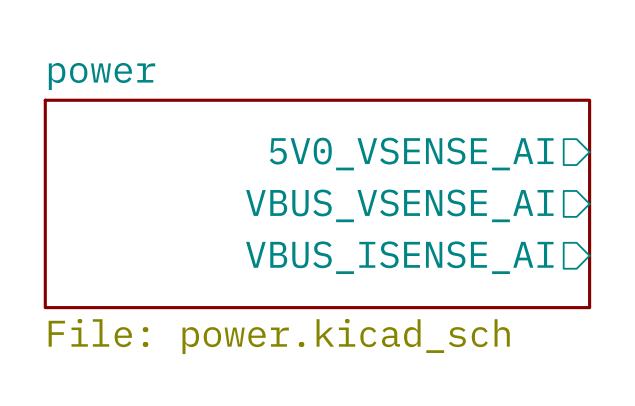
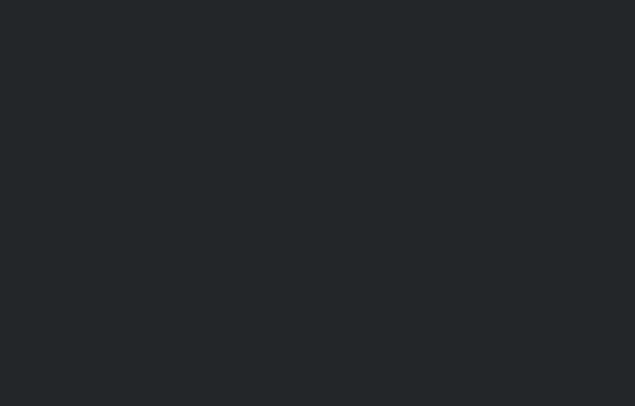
sheet pin: 5V0_VSENSE_AI (411, 154) -> none
sheet power: File: power.kicad_sch (317, 203) -> none
sheet pin: VBUS_VSENSE_AI (399, 205) -> none
sheet pin: VBUS_ISENSE_AI (399, 257) -> none

